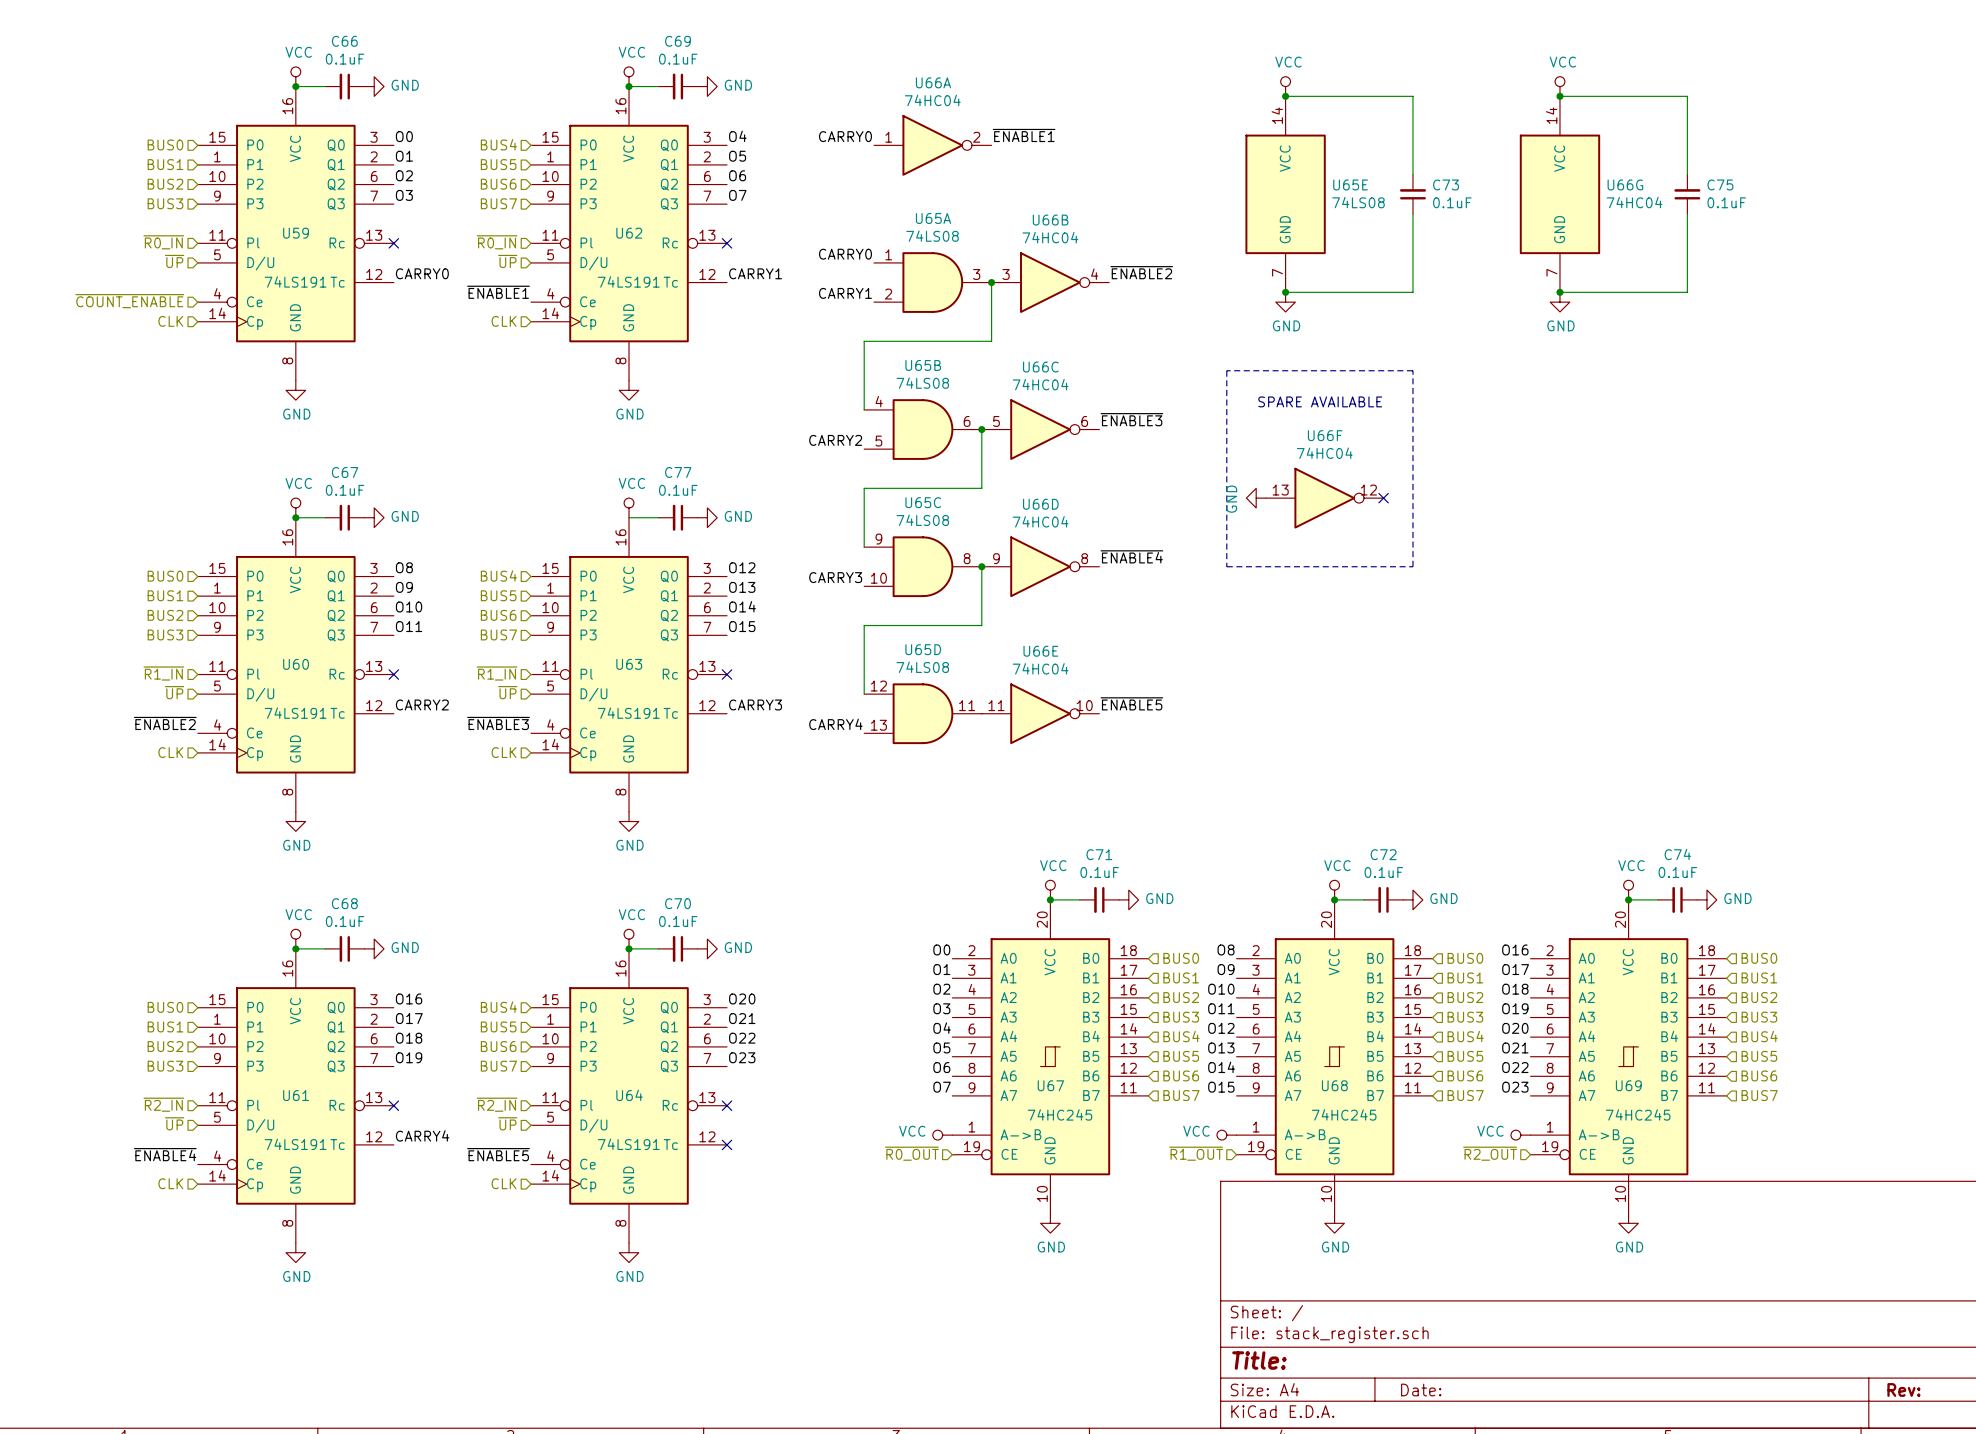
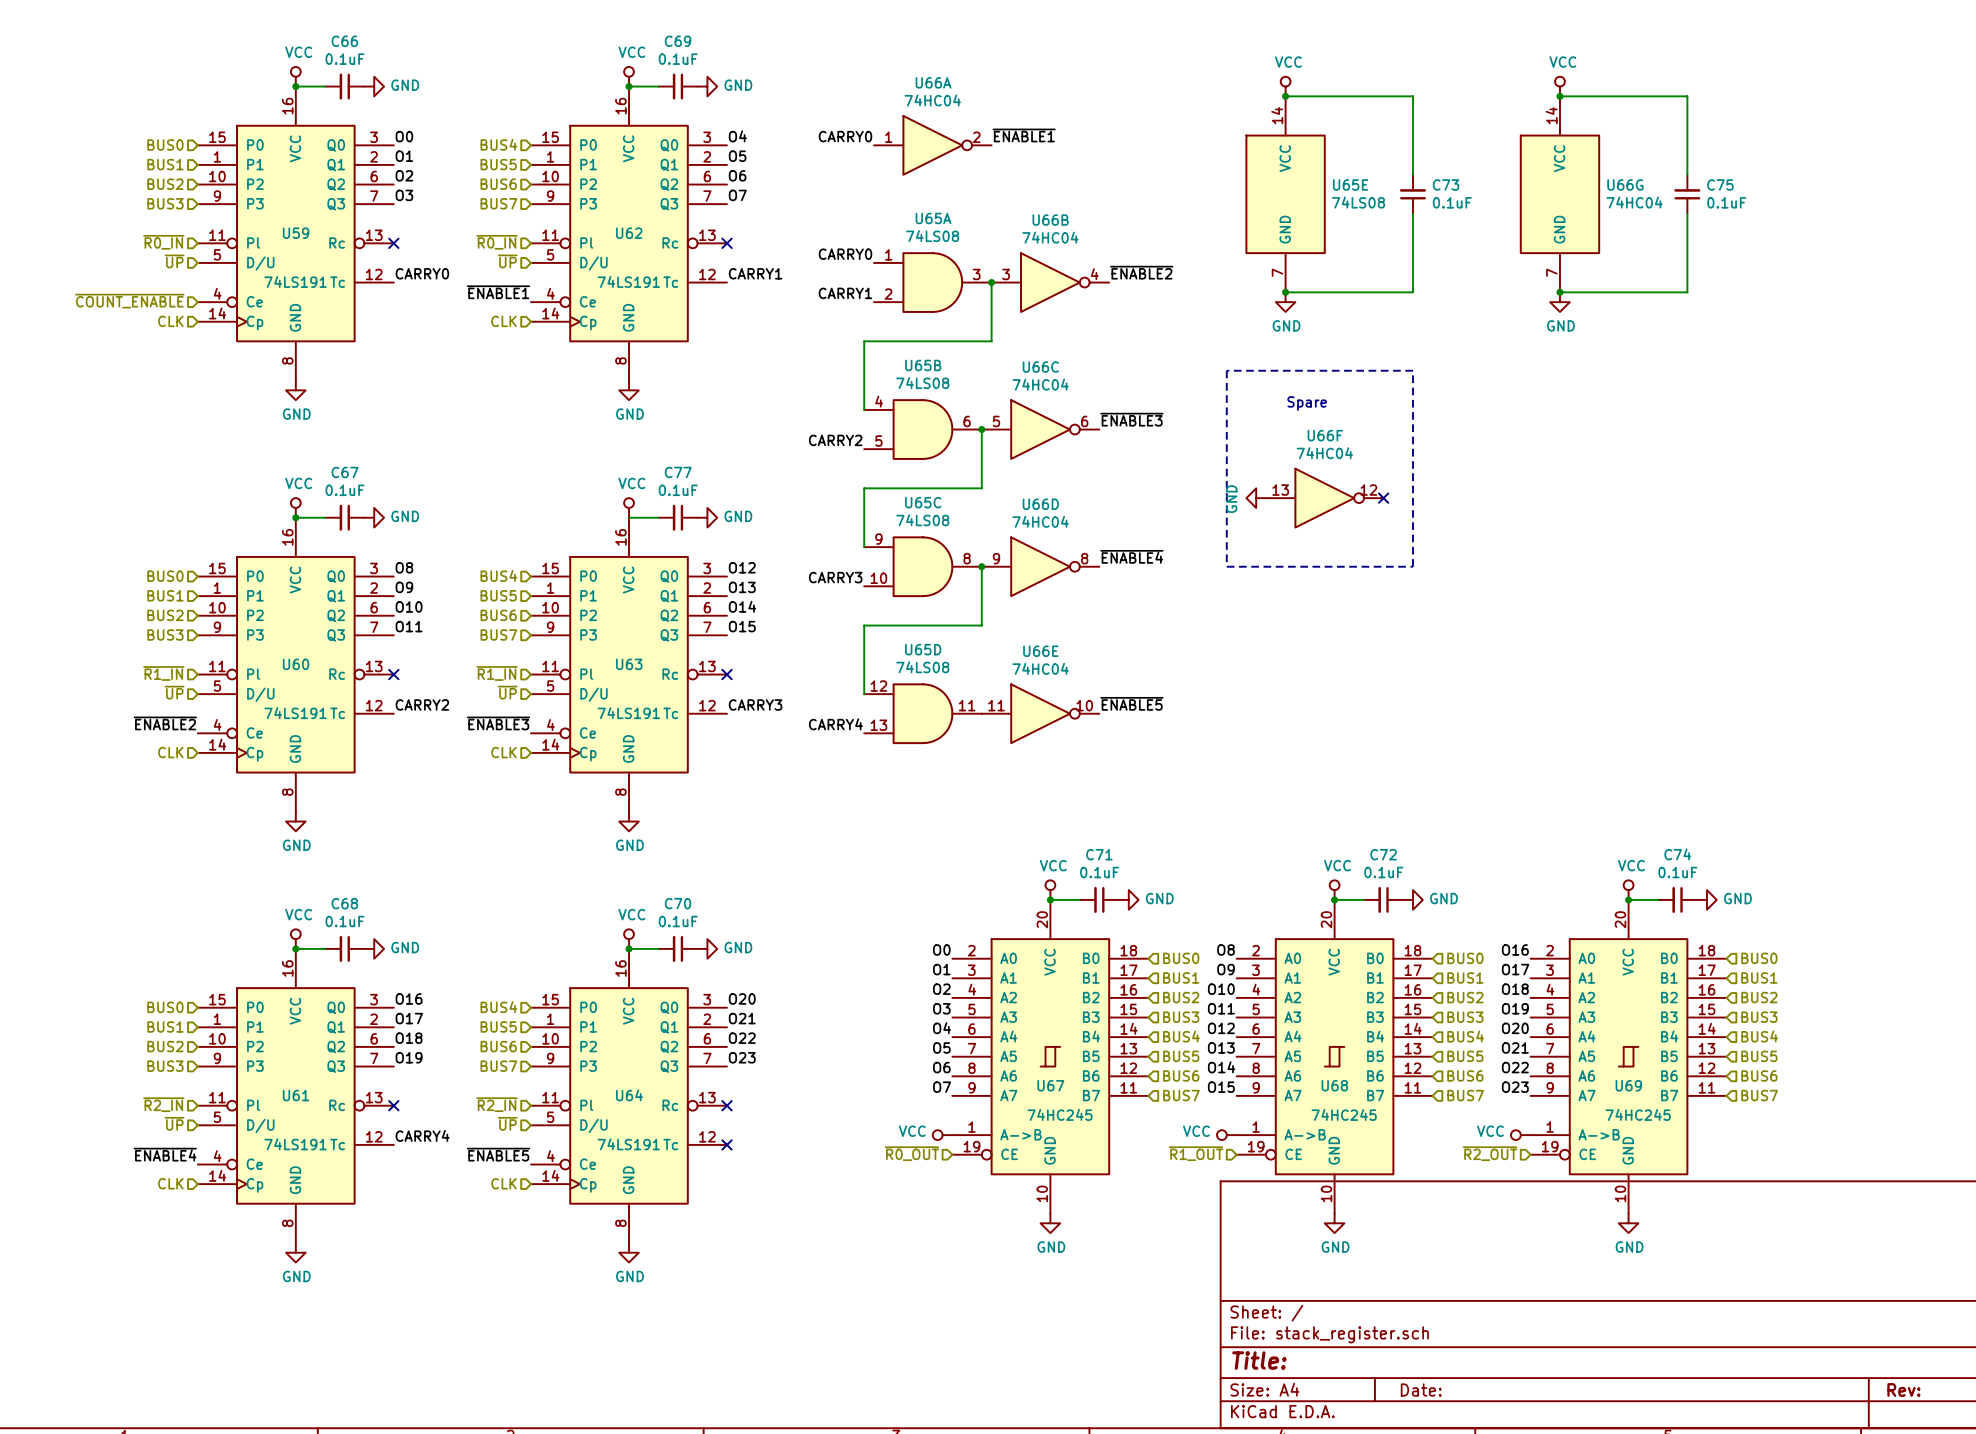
text: SPARE AVAILABLE (1320, 401) -> none
text: none -> Spare (1307, 403)

